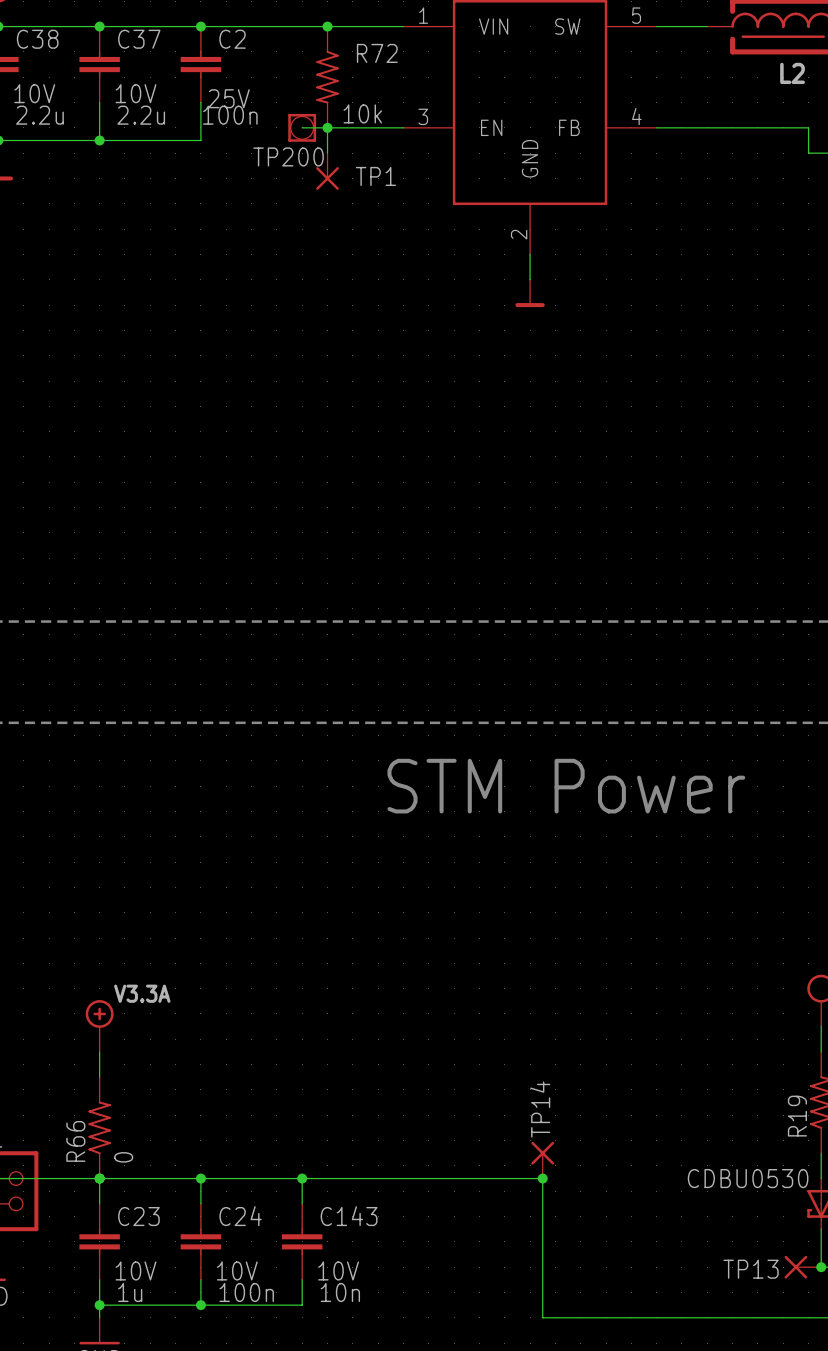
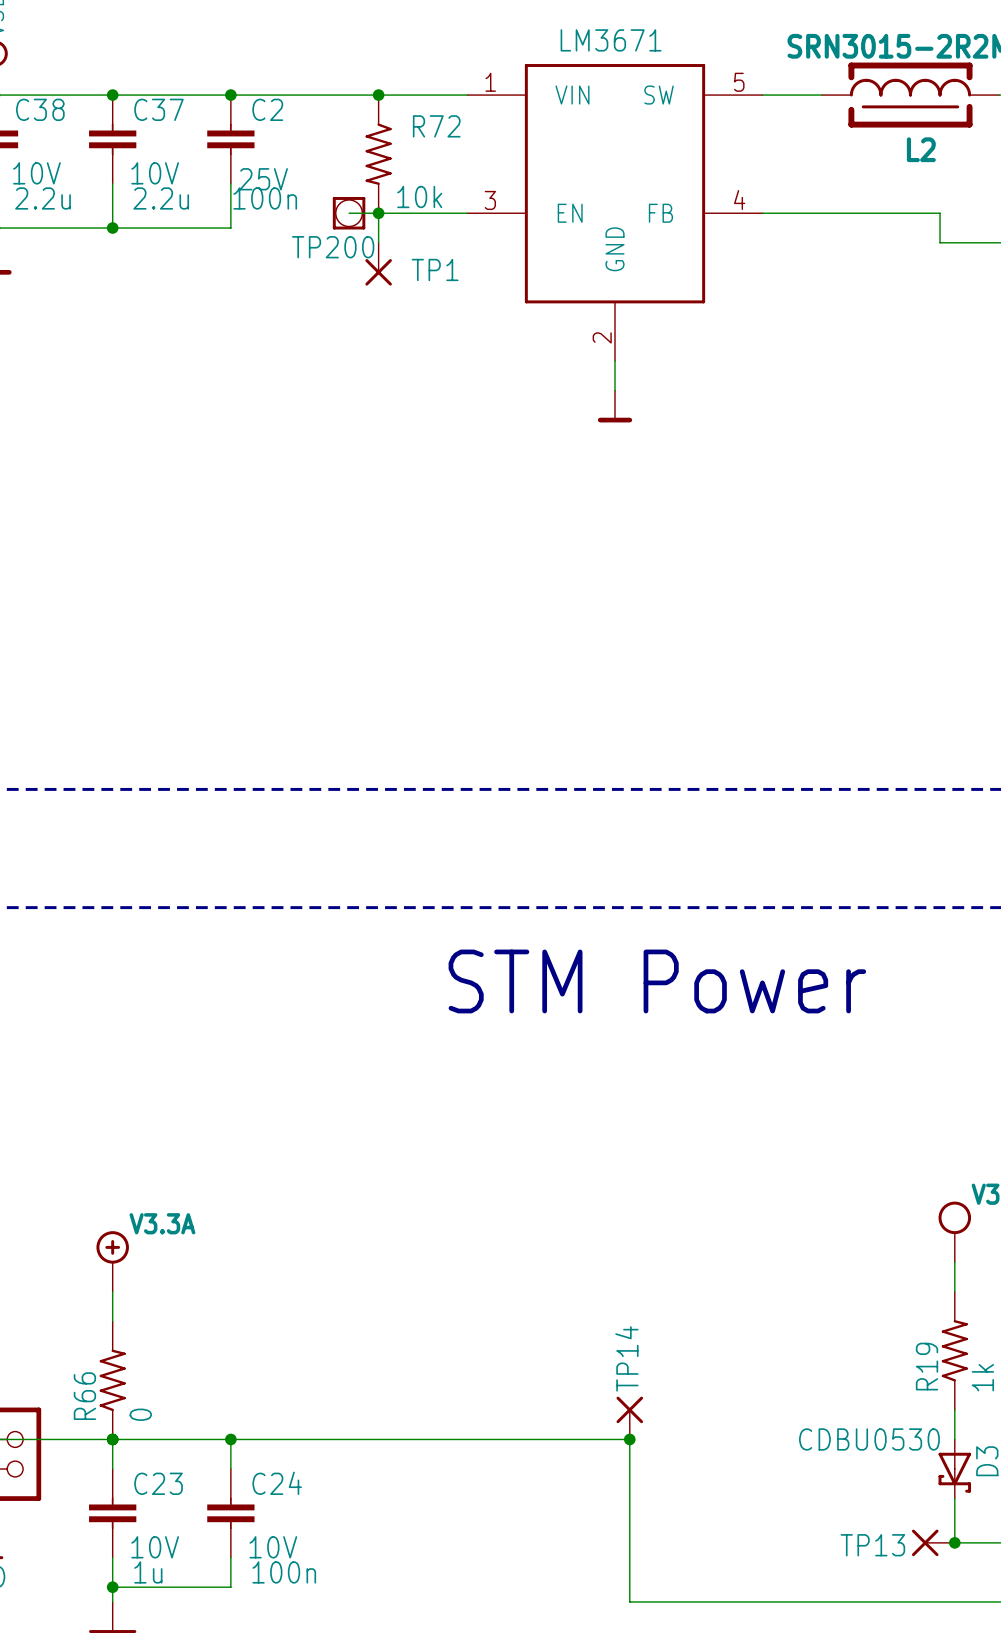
wire: (302, 1178) (302, 1203) -> none
junction: (302, 1178) -> none
C143: 10n (302, 1241) -> none
wire: (302, 1279) (302, 1305) (200, 1305) -> none
junction: (200, 1305) -> none

